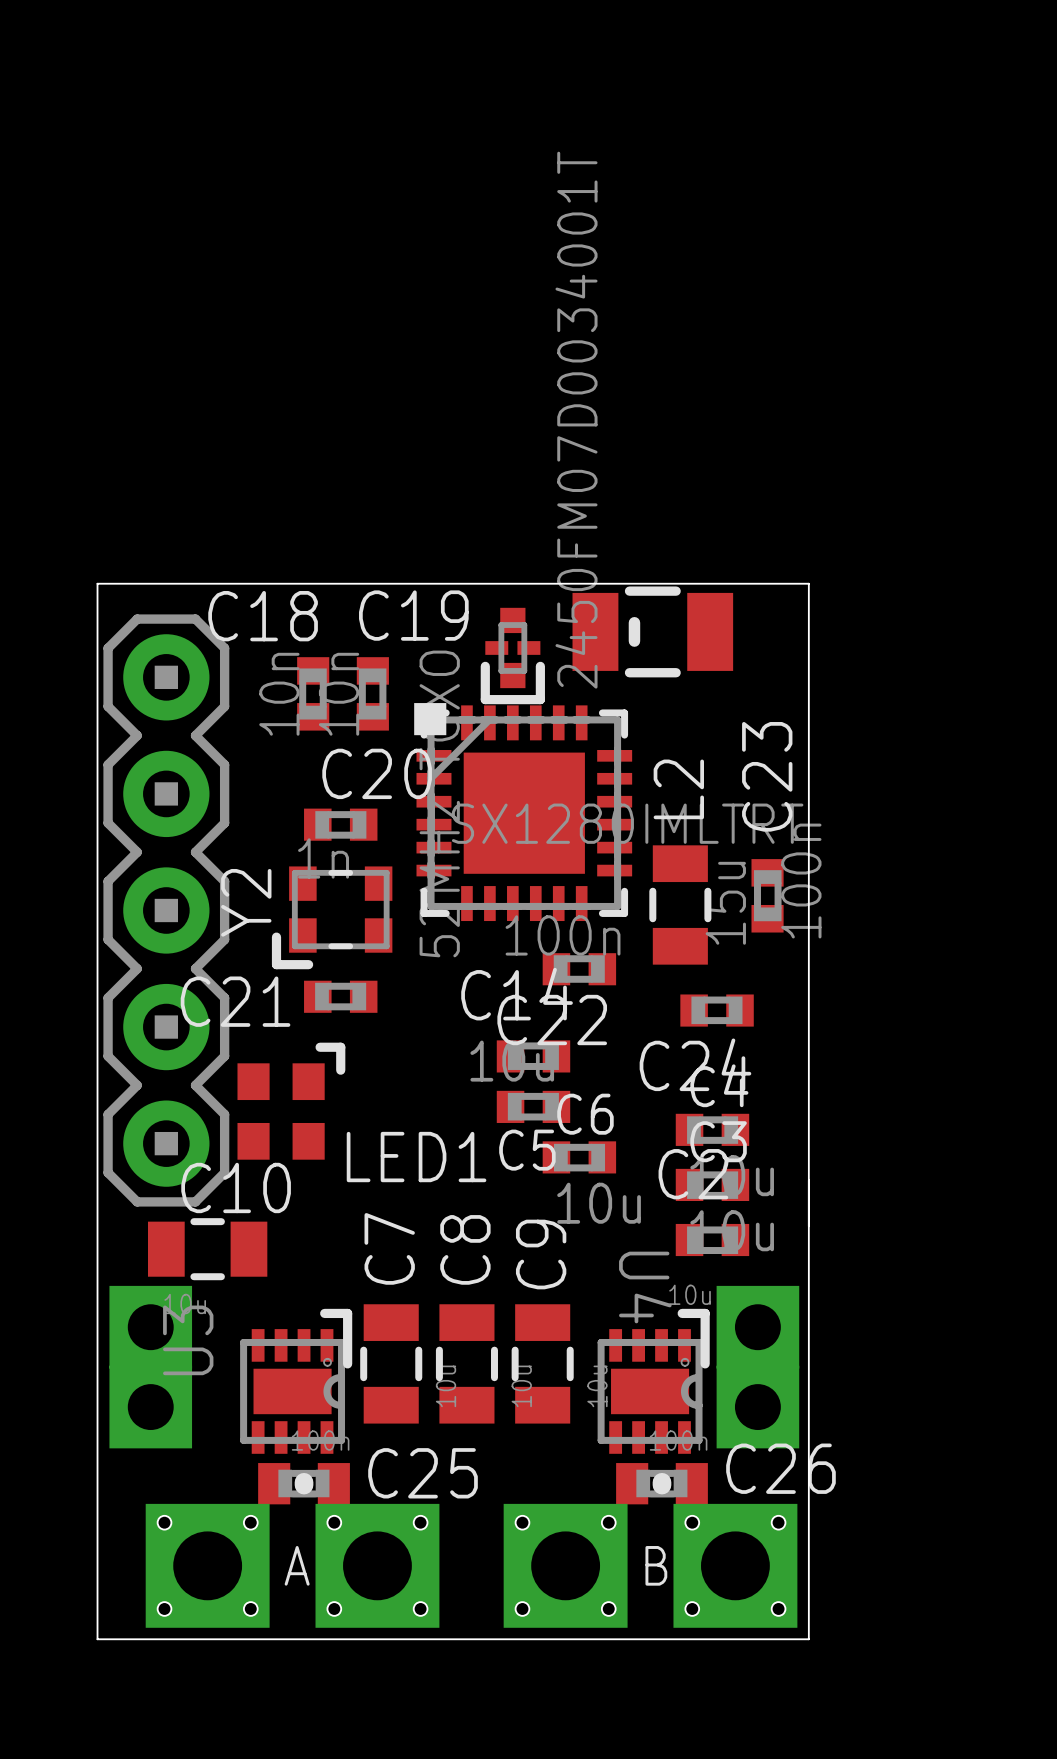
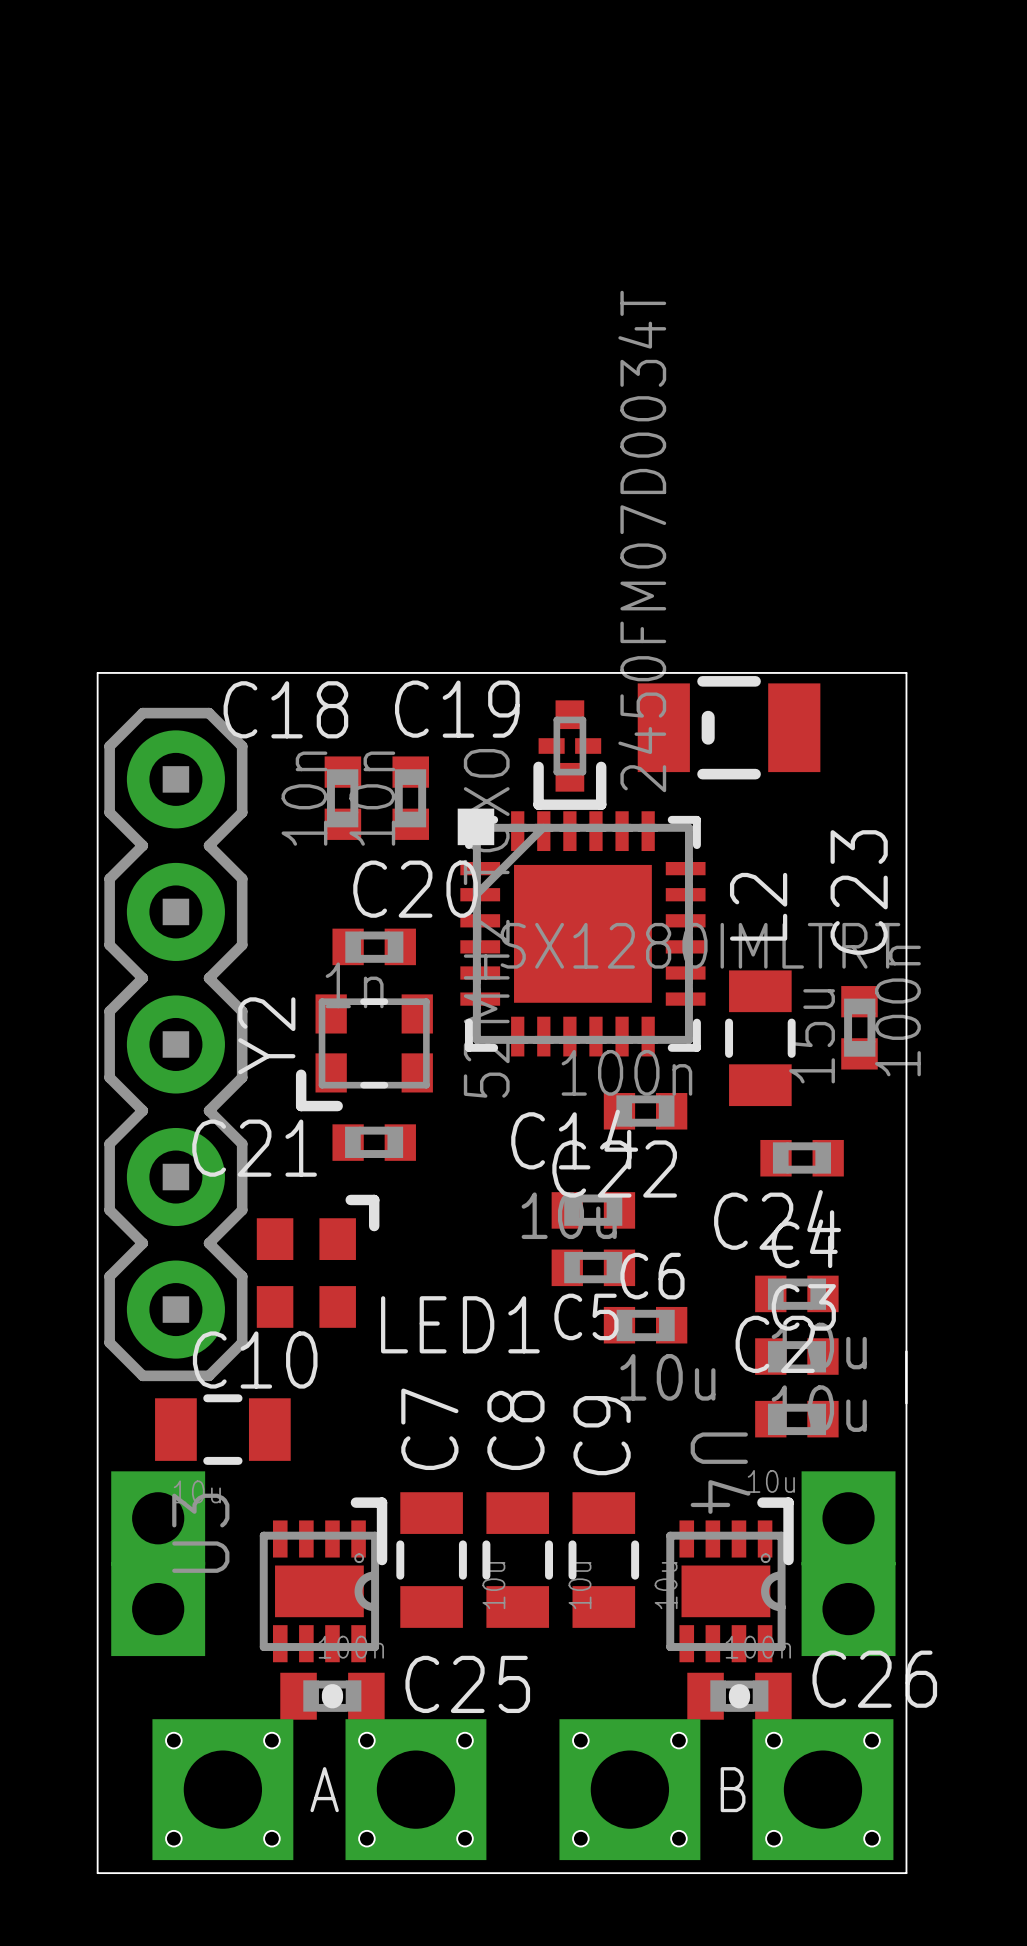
part value: 2450FM07D0034001T (576, 420) -> 2450FM07D0034T (642, 541)

